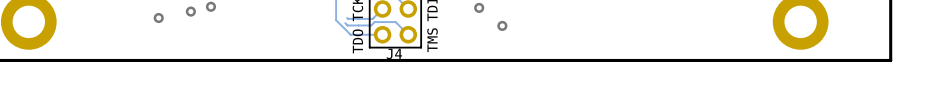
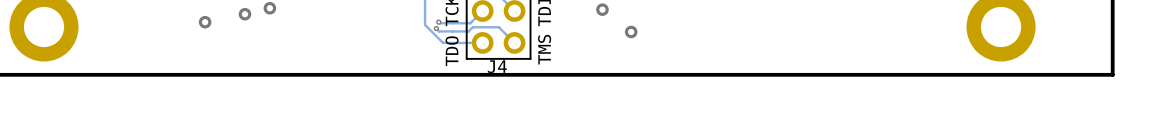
via: none -> (438, 22)
via: none -> (436, 28)

